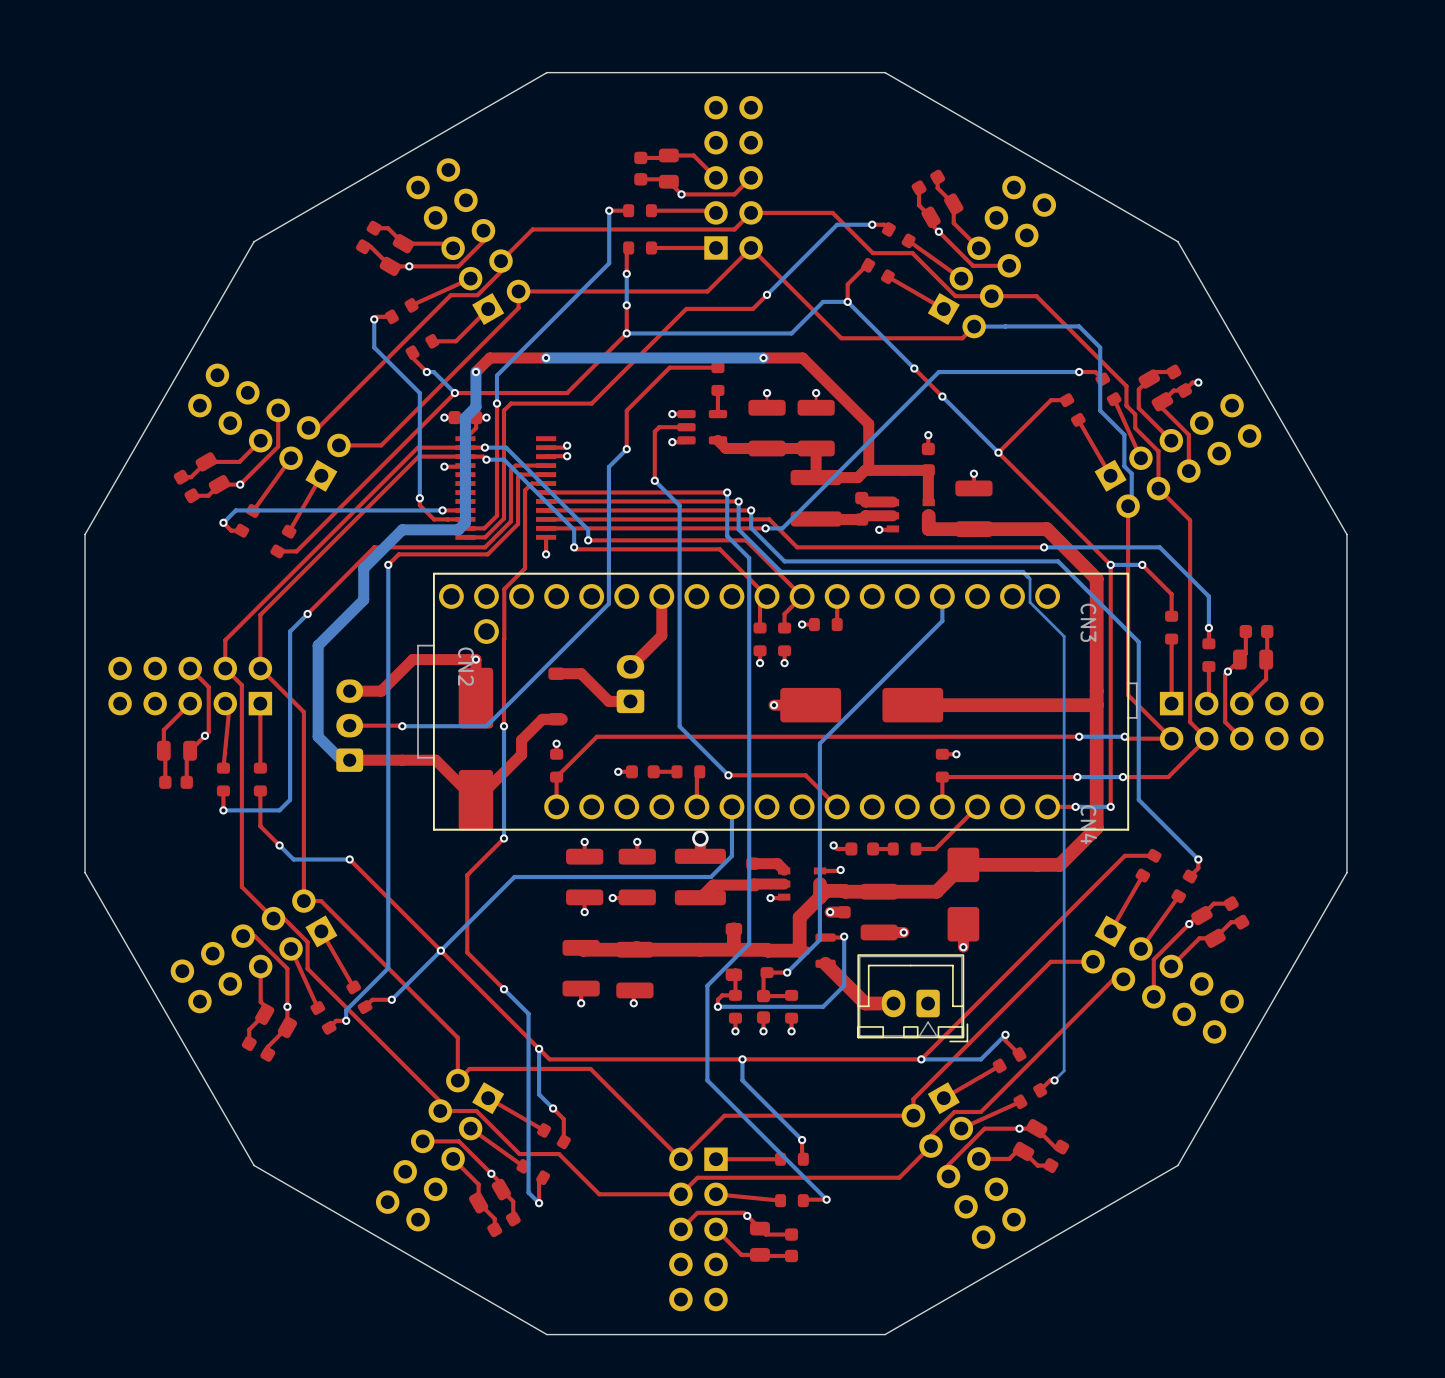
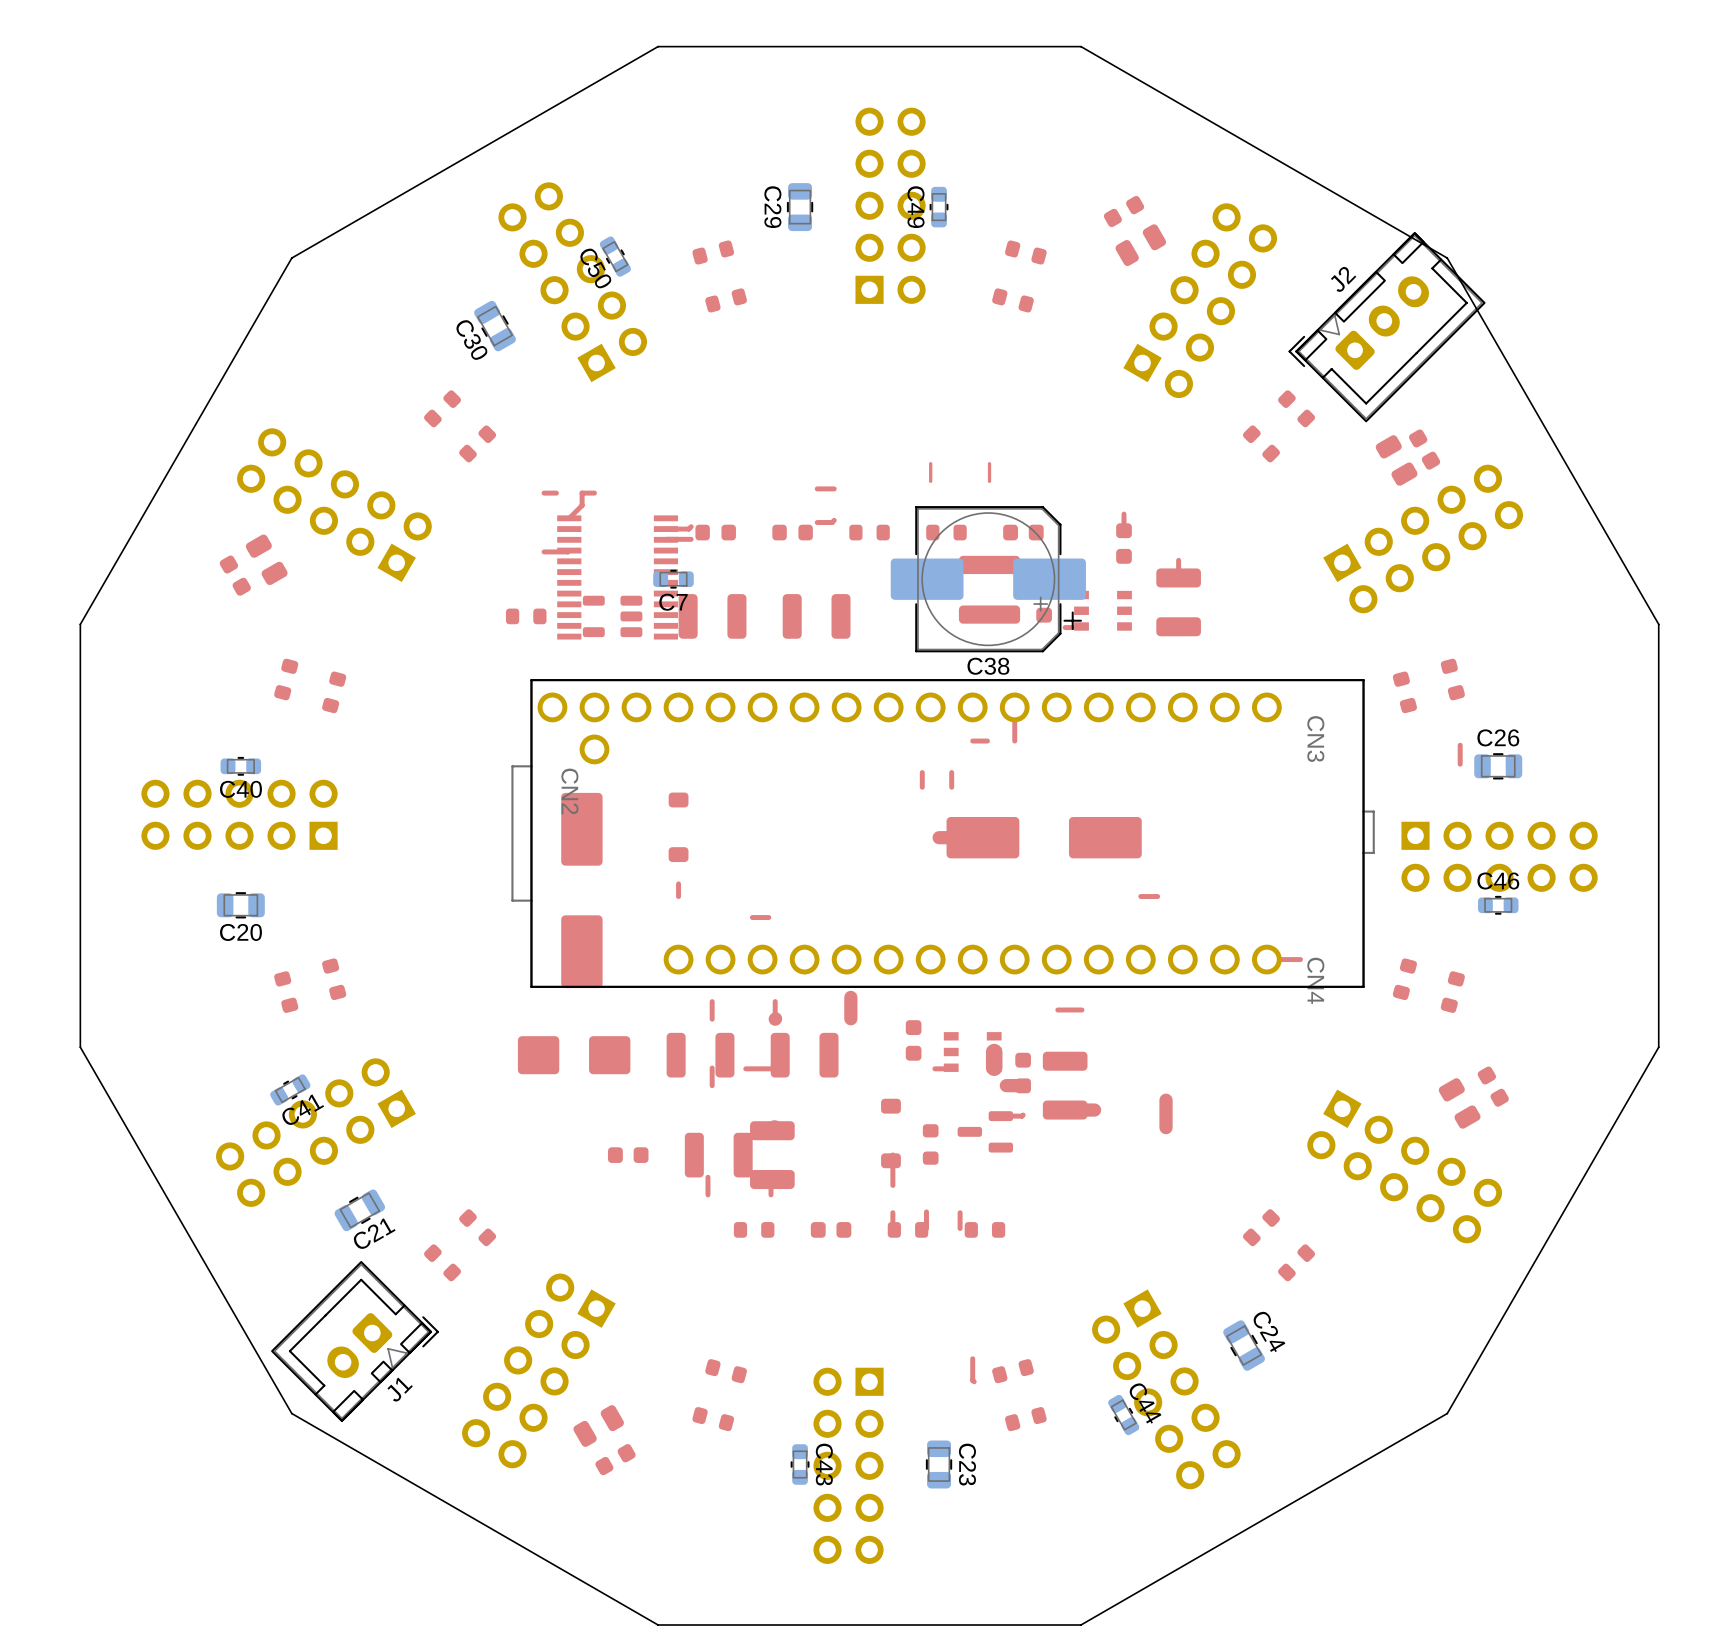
board edge: (885, 72) (1177, 241) (1346, 534) (1346, 872) (1177, 1165) (885, 1334) (546, 1334) (254, 1165) (85, 872) (85, 534) (254, 241) (546, 72) (885, 72) -> (1081, 46) (1447, 258) (1658, 624) (1658, 1047) (1447, 1413) (1081, 1624) (658, 1624) (291, 1413) (80, 1047) (80, 624) (291, 258) (658, 46) (1081, 46)
top track: (640, 157) (693, 155) (716, 177) -> none
C49 side: top (640, 168) -> bottom (939, 207)
C29 side: top (668, 168) -> bottom (800, 207)
top track: (751, 177) (734, 194) (681, 194) (666, 179) (640, 179) -> none
top track: (937, 177) (937, 188) (953, 204) (953, 223) (978, 248) -> none
top track: (919, 187) (919, 205) (931, 217) (931, 223) (972, 265) (1009, 265) -> none
via: (681, 194) -> none
bottom track: (609, 210) (609, 263) (496, 375) (496, 403) -> none
via: (609, 210) -> none
top track: (628, 210) (609, 210) -> none
part: (640, 210) -> none
top track: (651, 210) (713, 210) (716, 212) -> none
part: none -> (713, 252)
part: none -> (1025, 252)
top track: (872, 224) (884, 224) (888, 229) -> none
bottom track: (872, 224) (837, 224) (767, 294) -> none
via: (872, 224) -> none
top track: (374, 228) (388, 228) (403, 243) (448, 243) (453, 248) -> none
top track: (483, 230) (483, 241) (458, 266) (390, 266) (370, 246) (363, 246) -> none
via: (938, 231) -> none
part: (898, 235) -> none
C50 side: top (368, 237) -> bottom (615, 256)
top track: (908, 240) (961, 278) -> none
top track: (628, 247) (626, 249) (626, 273) -> none
part: (640, 247) -> none
top track: (716, 247) (651, 247) -> none
C30 side: top (396, 255) -> bottom (495, 326)
part: none -> (726, 300)
part: none -> (1012, 300)
top track: (868, 265) (847, 284) (847, 301) -> none
via: (409, 266) -> none
part: (878, 271) -> none
bottom track: (626, 273) (626, 305) -> none
via: (626, 273) -> none
top track: (887, 276) (943, 309) -> none
top track: (470, 278) (411, 305) -> none
J2: none -> (1387, 327)
top track: (767, 294) (753, 308) (686, 308) (591, 403) (511, 403) (504, 410) (504, 518) (485, 537) (465, 537) -> none
via: (767, 294) -> none
via: (847, 301) -> none
top track: (626, 305) (626, 333) (567, 393) (454, 393) (296, 551) (277, 551) -> none
via: (626, 305) -> none
top track: (488, 309) (455, 341) (432, 341) -> none
part: (401, 311) -> none
top track: (391, 316) (376, 316) (374, 319) -> none
bottom track: (374, 319) (374, 347) (419, 393) (419, 498) -> none
via: (374, 319) -> none
top track: (974, 326) (962, 338) (841, 338) (751, 247) (707, 291) (518, 291) (518, 308) (381, 445) (338, 445) -> none
bottom track: (1005, 326) (1079, 326) (1100, 347) (1100, 410) (1124, 434) (1124, 466) (1131, 473) (1131, 502) (1128, 506) -> none
bottom track: (1005, 326) (974, 326) -> none
bottom track: (626, 333) (791, 333) (823, 301) (847, 301) (914, 368) -> none
via: (626, 333) -> none
part: none -> (442, 408)
part: (422, 347) -> none
part: none -> (1296, 408)
top track: (412, 352) (412, 357) (426, 372) -> none
top track: (546, 357) (489, 357) (475, 372) -> none
via: (546, 357) -> none
top track: (763, 357) (802, 357) (868, 424) (868, 470) -> none
bottom track: (763, 357) (546, 357) -> none
via: (763, 357) -> none
top track: (717, 367) (669, 367) (626, 410) (626, 449) -> none
top track: (914, 368) (942, 396) -> none
via: (914, 368) -> none
bottom track: (426, 372) (433, 372) (454, 393) -> none
via: (426, 372) -> none
bottom track: (475, 372) (475, 407) (465, 417) (465, 522) (458, 529) (402, 529) (363, 568) (363, 599) (318, 645) (318, 736) (341, 760) (349, 760) -> none
via: (475, 372) -> none
top track: (1079, 372) (1095, 372) (1102, 379) -> none
bottom track: (1079, 372) (938, 372) (782, 528) (765, 528) -> none
via: (1079, 372) -> none
top track: (1173, 372) (1156, 372) (1138, 389) (1138, 408) (1171, 440) -> none
part: none -> (477, 443)
part: none -> (1261, 443)
part: (717, 379) -> none
top track: (1198, 382) (1192, 382) (1184, 390) (1173, 390) (1162, 401) (1162, 408) (1188, 434) (1188, 471) -> none
via: (1198, 382) -> none
part: (1108, 389) -> none
top track: (717, 390) (717, 414) -> none
via: (454, 393) -> none
via: (767, 393) -> none
via: (816, 393) -> none
bottom track: (942, 396) (998, 452) -> none
via: (942, 396) -> none
top track: (1114, 399) (1140, 458) -> none
top track: (1066, 400) (1051, 400) (998, 452) (1110, 564) (1110, 806) -> none
top track: (496, 403) (496, 515) (484, 528) (465, 528) -> none
via: (496, 403) -> none
top track: (278, 410) (278, 446) (240, 484) (219, 484) (208, 495) (192, 495) -> none
part: (1072, 410) -> none
via: (672, 414) -> none
via: (444, 417) -> none
C7 side: top (465, 417) -> bottom (673, 579)
via: (486, 417) -> none
top track: (1078, 419) (1110, 475) -> none
top track: (308, 427) (318, 427) (450, 295) (477, 295) (501, 271) (501, 261) (532, 229) (734, 229) (751, 212) (832, 212) (872, 253) (912, 253) (955, 296) (1036, 296) (1126, 386) (1126, 405) (1135, 414) (1135, 428) (1158, 451) (1158, 488) (1190, 520) (1190, 722) (1206, 738) (1168, 777) (1122, 777) -> none
top track: (686, 427) (659, 427) (654, 431) (654, 480) -> none
part rotation: 0° (702, 427) -> 180° (612, 616)
part position: (702, 427) -> (612, 616)
part: (767, 428) -> none
part: (816, 428) -> none
via: (928, 435) -> none
top track: (260, 440) (239, 461) (206, 461) (191, 477) (181, 477) -> none
top track: (717, 440) (726, 448) (816, 448) (816, 477) (857, 477) (865, 470) (928, 470) -> none
via: (672, 442) -> none
via: (567, 445) -> none
top track: (484, 447) (417, 447) (225, 640) (225, 668) (241, 685) (241, 886) (273, 918) (284, 918) (307, 942) (307, 968) (440, 1101) (440, 1111) (476, 1111) (519, 1154) (559, 1154) (599, 1194) (680, 1194) (697, 1177) (899, 1177) (930, 1146) (930, 1135) (954, 1111) (980, 1111) (1113, 979) (1123, 979) -> none
bottom track: (484, 447) (506, 447) (588, 529) (588, 540) -> none
via: (484, 447) -> none
bottom track: (626, 449) (608, 466) (608, 603) (486, 726) (402, 726) -> none
via: (626, 449) -> none
part: none -> (715, 532)
part: none -> (792, 532)
part: none -> (869, 532)
part: none -> (946, 532)
part: none -> (1023, 532)
via: (998, 452) -> none
via: (567, 456) -> none
top track: (291, 458) (253, 510) -> none
top track: (486, 459) (483, 456) (418, 456) (260, 614) (260, 668) (303, 712) (303, 901) (321, 901) (457, 1037) (457, 1080) (469, 1068) (590, 1068) (680, 1159) (724, 1115) (913, 1115) (913, 1099) (1050, 961) (1093, 961) -> none
bottom track: (486, 459) (504, 459) (574, 529) (574, 547) -> none
via: (486, 459) -> none
top track: (546, 465) (515, 465) (511, 470) (511, 521) (484, 547) (374, 547) (307, 614) -> none
via: (444, 466) -> none
top track: (928, 470) (928, 500) -> none
via: (973, 473) -> none
top track: (546, 474) (520, 474) (518, 477) (518, 524) (487, 554) (398, 554) (388, 564) -> none
top track: (321, 475) (289, 531) -> none
bottom track: (654, 480) (679, 505) (679, 726) (728, 775) -> none
via: (654, 480) -> none
top track: (546, 483) (531, 483) (525, 490) (525, 568) (504, 589) (504, 726) -> none
via: (240, 484) -> none
C38: none -> (988, 579)
top track: (727, 492) (546, 492) -> none
bottom track: (727, 492) (727, 536) (749, 558) (749, 943) (707, 985) (707, 1080) (826, 1199) -> none
via: (727, 492) -> none
top track: (419, 498) (419, 505) (433, 519) (465, 519) -> none
via: (419, 498) -> none
top track: (546, 501) (738, 501) -> none
bottom track: (738, 501) (738, 529) (781, 571) (1023, 571) (1030, 578) (1030, 602) (1064, 636) (1064, 1070) (1054, 1080) -> none
via: (738, 501) -> none
top track: (892, 502) (865, 502) (861, 498) (866, 502) -> none
top track: (1128, 506) (1128, 695) (1171, 738) (1126, 738) (1124, 736) -> none
bottom track: (442, 510) (235, 510) (223, 522) -> none
via: (442, 510) -> none
top track: (465, 510) (442, 510) -> none
top track: (751, 510) (546, 510) -> none
bottom track: (751, 510) (751, 527) (784, 561) (1058, 561) (1138, 642) (1138, 799) (1198, 859) -> none
via: (751, 510) -> none
top track: (892, 515) (865, 515) (861, 519) (816, 518) -> none
top track: (928, 515) (928, 529) (1046, 529) (1096, 578) (1096, 827) (1059, 864) (963, 864) (936, 891) (826, 890) (799, 917) (799, 950) (735, 949) -> none
top track: (546, 519) (769, 519) (797, 547) (1044, 547) -> none
part: (247, 520) -> none
part: none -> (526, 616)
part: none -> (712, 616)
part: none -> (816, 616)
top track: (223, 522) (231, 530) (241, 530) -> none
via: (223, 522) -> none
top track: (765, 528) (546, 528) -> none
via: (765, 528) -> none
via: (879, 529) -> none
top track: (546, 536) (546, 554) -> none
top track: (588, 540) (745, 540) (802, 596) (784, 614) (784, 628) -> none
via: (588, 540) -> none
part: (283, 541) -> none
top track: (574, 547) (576, 549) (719, 549) (767, 596) (760, 603) (760, 628) -> none
via: (574, 547) -> none
bottom track: (1044, 547) (1159, 547) (1208, 596) (1208, 628) -> none
via: (1044, 547) -> none
via: (546, 554) -> none
bottom track: (388, 564) (388, 968) (346, 1010) (346, 1020) -> none
via: (388, 564) -> none
via: (1110, 564) -> none
top track: (1142, 564) (1171, 594) (1171, 616) -> none
bottom track: (1142, 564) (1110, 564) -> none
via: (1142, 564) -> none
part: none -> (286, 679)
part: none -> (1452, 679)
part: none -> (334, 692)
part: none -> (1404, 692)
top track: (661, 596) (661, 635) (630, 666) -> none
bottom track: (942, 596) (942, 621) (819, 743) (819, 939) (787, 972) -> none
bottom track: (307, 614) (290, 631) (290, 799) (279, 810) (223, 810) -> none
via: (307, 614) -> none
via: (802, 624) -> none
part: (825, 624) -> none
part: (1171, 627) -> none
via: (1208, 628) -> none
top track: (1245, 631) (1245, 653) (1225, 674) (1225, 722) (1241, 738) -> none
C46 side: top (1256, 631) -> bottom (1498, 905)
top track: (1267, 631) (1266, 679) (1241, 703) -> none
part: (760, 639) -> none
part: (784, 639) -> none
top track: (1171, 639) (1171, 703) -> none
part: (1208, 655) -> none
via: (475, 659) -> none
C26 side: top (1253, 659) -> bottom (1498, 766)
via: (760, 663) -> none
via: (784, 663) -> none
top track: (1208, 666) (1208, 701) (1206, 703) -> none
top track: (190, 668) (208, 687) (208, 732) (186, 754) (186, 782) -> none
via: (1227, 671) -> none
top track: (562, 673) (581, 673) (608, 701) (630, 701) -> none
part: (630, 684) -> none
top track: (349, 691) (381, 691) (412, 659) (475, 659) (475, 698) -> none
top track: (190, 703) (163, 730) (165, 782) -> none
top track: (229, 703) (223, 768) -> none
top track: (260, 703) (260, 768) -> none
via: (774, 705) -> none
top track: (1096, 705) (912, 705) -> none
top track: (562, 719) (542, 719) (521, 740) (521, 754) (475, 800) (435, 760) (349, 760) -> none
top track: (349, 725) (402, 726) -> none
part: (349, 725) -> none
via: (402, 726) -> none
bottom track: (504, 726) (504, 838) -> none
via: (504, 726) -> none
via: (205, 735) -> none
top track: (1079, 736) (596, 736) (556, 777) (556, 806) -> none
via: (1079, 736) -> none
bottom track: (1124, 736) (1079, 736) -> none
via: (1124, 736) -> none
via: (556, 743) -> none
C20 side: top (176, 750) -> bottom (240, 905)
via: (956, 754) -> none
part: (556, 765) -> none
part: (942, 765) -> none
via: (618, 771) -> none
part: (642, 771) -> none
top track: (676, 771) (653, 771) -> none
part: (688, 771) -> none
top track: (699, 771) (696, 774) (696, 806) -> none
top track: (728, 775) (805, 775) (837, 806) -> none
via: (728, 775) -> none
top track: (1077, 777) (942, 777) (942, 806) -> none
via: (1077, 777) -> none
bottom track: (1122, 777) (1077, 777) -> none
via: (1122, 777) -> none
part: (223, 779) -> none
part: (260, 779) -> none
C40 side: top (176, 782) -> bottom (240, 766)
top track: (223, 790) (223, 810) -> none
top track: (260, 790) (260, 826) (279, 845) -> none
bottom track: (731, 806) (731, 855) (710, 877) (514, 877) (391, 999) -> none
top track: (977, 806) (935, 848) (916, 848) -> none
via: (1075, 806) -> none
bottom track: (1110, 806) (1075, 806) -> none
via: (1110, 806) -> none
via: (223, 810) -> none
part: none -> (334, 979)
part: none -> (1404, 979)
part: none -> (286, 992)
part: none -> (1452, 992)
top track: (504, 838) (467, 875) (467, 952) (504, 989) -> none
via: (504, 838) -> none
via: (700, 838) -> none
via: (584, 841) -> none
via: (637, 841) -> none
bottom track: (279, 845) (293, 859) (349, 859) -> none
via: (279, 845) -> none
top track: (833, 845) (837, 848) (851, 848) -> none
via: (833, 845) -> none
part: (862, 848) -> none
part: (904, 848) -> none
top track: (1154, 855) (1124, 855) (921, 1059) (549, 1059) (349, 859) -> none
via: (349, 859) -> none
top track: (1198, 859) (1198, 868) (1190, 876) -> none
via: (1198, 859) -> none
top track: (752, 863) (777, 863) (784, 870) -> none
part: (1148, 865) -> none
top track: (840, 870) (820, 870) -> none
via: (840, 870) -> none
top track: (1142, 875) (1110, 931) -> none
part rotation: 0° (584, 877) -> 90° clockwise (700, 1055)
part rotation: 0° (637, 877) -> 90° clockwise (804, 1055)
part: (700, 877) -> none
top track: (784, 884) (713, 885) (700, 897) -> none
part: none -> (574, 1055)
part: (1184, 886) -> none
part: (963, 894) -> none
top track: (1178, 896) (1140, 948) -> none
via: (612, 898) -> none
via: (770, 898) -> none
top track: (1231, 903) (1213, 903) (1201, 915) (1197, 915) (1153, 959) (1153, 996) -> none
via: (584, 912) -> none
via: (830, 912) -> none
top track: (1241, 922) (1231, 922) (1215, 938) (1199, 938) (1171, 966) -> none
via: (1189, 924) -> none
top track: (733, 929) (735, 949) (583, 949) (581, 947) -> none
top track: (321, 931) (353, 987) -> none
via: (903, 932) -> none
top track: (243, 936) (254, 936) (287, 968) (287, 1027) (267, 1046) (267, 1054) -> none
bottom track: (844, 936) (844, 985) (823, 1006) (717, 1006) -> none
via: (844, 936) -> none
via: (963, 947) -> none
top track: (291, 948) (317, 1008) -> none
via: (440, 950) -> none
top track: (825, 963) (865, 1003) (893, 1003) -> none
top track: (260, 966) (260, 1001) (264, 1005) (264, 1014) (249, 1029) (249, 1043) -> none
part rotation: 0° (581, 968) -> 90° clockwise (718, 1155)
part: none -> (628, 1155)
top track: (787, 972) (767, 972) (763, 976) (763, 996) (791, 995) -> none
via: (787, 972) -> none
bottom track: (504, 989) (528, 1013) (528, 1192) (539, 1203) -> none
via: (504, 989) -> none
top track: (736, 996) (722, 995) (717, 999) (717, 1006) -> none
part: (359, 997) -> none
part: (912, 998) -> none
top track: (391, 999) (372, 999) (365, 1007) -> none
via: (391, 999) -> none
via: (581, 1003) -> none
via: (633, 1003) -> none
via: (287, 1006) -> none
via: (717, 1006) -> none
part: (735, 1006) -> none
part rotation: 0° (763, 1006) -> 90° clockwise (831, 1229)
part position: (763, 1006) -> (831, 1229)
part: (791, 1006) -> none
part: (323, 1017) -> none
C21 side: top (276, 1020) -> bottom (359, 1210)
top track: (346, 1020) (336, 1020) (329, 1027) -> none
via: (346, 1020) -> none
part: none -> (477, 1227)
part: none -> (1261, 1227)
via: (735, 1031) -> none
via: (763, 1031) -> none
via: (791, 1031) -> none
part: none -> (754, 1229)
part: none -> (908, 1229)
part: none -> (984, 1229)
top track: (1005, 1034) (1005, 1040) (1019, 1054) -> none
bottom track: (1005, 1034) (980, 1059) (921, 1059) -> none
via: (1005, 1034) -> none
C41 side: top (258, 1048) -> bottom (290, 1089)
bottom track: (539, 1048) (539, 1094) (553, 1108) -> none
via: (539, 1048) -> none
part: none -> (442, 1262)
bottom track: (742, 1059) (742, 1080) (802, 1140) -> none
via: (742, 1059) -> none
via: (921, 1059) -> none
part: none -> (1296, 1262)
part: (1009, 1060) -> none
top track: (999, 1065) (943, 1098) -> none
top track: (1054, 1080) (1050, 1080) (1040, 1090) -> none
via: (1054, 1080) -> none
part: (1030, 1096) -> none
top track: (488, 1098) (544, 1130) -> none
top track: (1020, 1101) (961, 1128) -> none
top track: (553, 1108) (563, 1119) (563, 1141) -> none
via: (553, 1108) -> none
J1: none -> (354, 1341)
top track: (470, 1128) (523, 1166) -> none
via: (1019, 1128) -> none
part: (553, 1136) -> none
via: (802, 1140) -> none
C24 side: top (1030, 1140) -> bottom (1244, 1345)
top track: (422, 1141) (459, 1141) (501, 1183) (501, 1189) (513, 1201) (513, 1218) -> none
top track: (1061, 1147) (1054, 1147) (1036, 1128) (984, 1128) (948, 1164) (948, 1176) -> none
part: none -> (726, 1371)
part: none -> (1012, 1371)
C44 side: top (1056, 1156) -> bottom (1123, 1415)
top track: (453, 1158) (478, 1184) (478, 1202) (494, 1218) (494, 1229) -> none
top track: (978, 1158) (1009, 1158) (1016, 1151) (1023, 1151) (1037, 1165) (1050, 1165) -> none
top track: (780, 1159) (716, 1159) -> none
part: (791, 1159) -> none
part: (533, 1172) -> none
via: (491, 1173) -> none
top track: (543, 1177) (539, 1181) (539, 1203) -> none
part: none -> (713, 1419)
part: none -> (1025, 1419)
top track: (716, 1194) (780, 1200) -> none
top track: (826, 1199) (803, 1200) -> none
via: (826, 1199) -> none
part: (791, 1200) -> none
via: (539, 1203) -> none
via: (747, 1215) -> none
top track: (680, 1229) (697, 1212) (744, 1212) (765, 1234) (791, 1234) -> none
top track: (716, 1229) (741, 1254) (791, 1255) -> none
C23 side: top (759, 1241) -> bottom (939, 1464)
C43 side: top (791, 1245) -> bottom (800, 1464)

